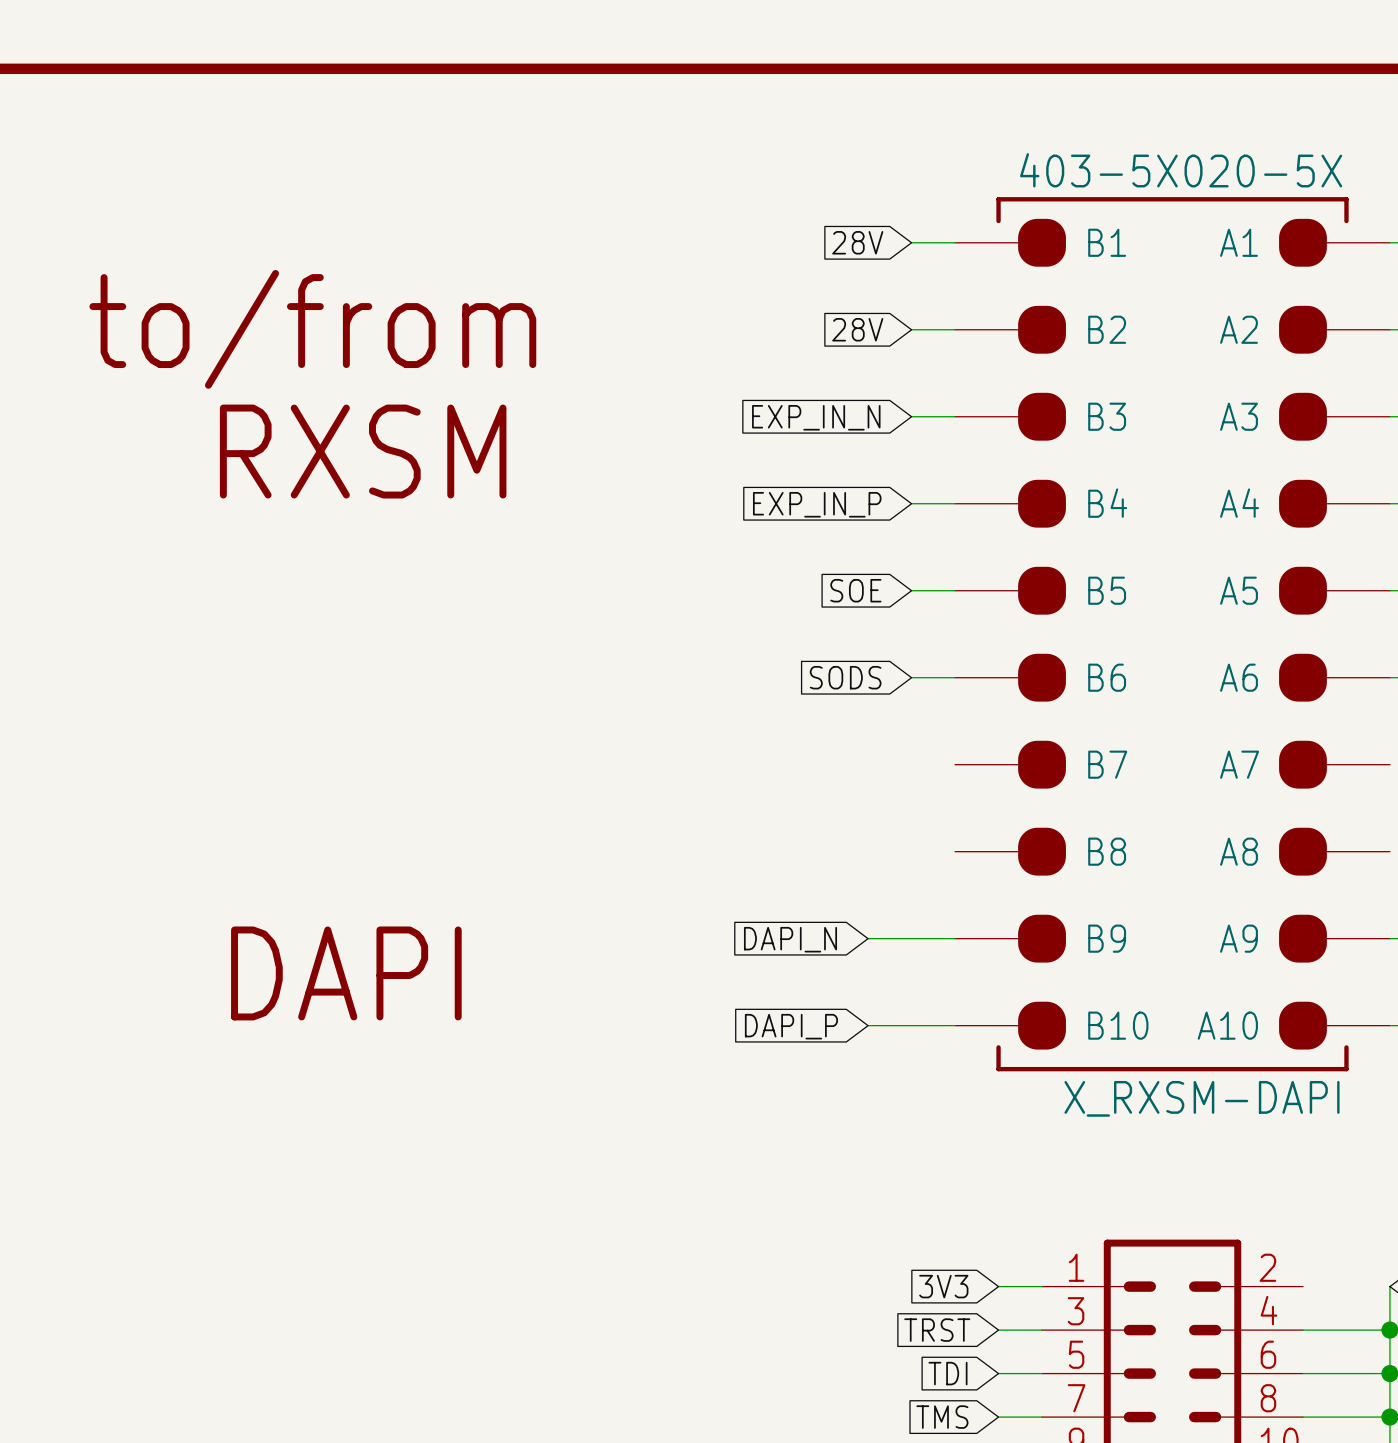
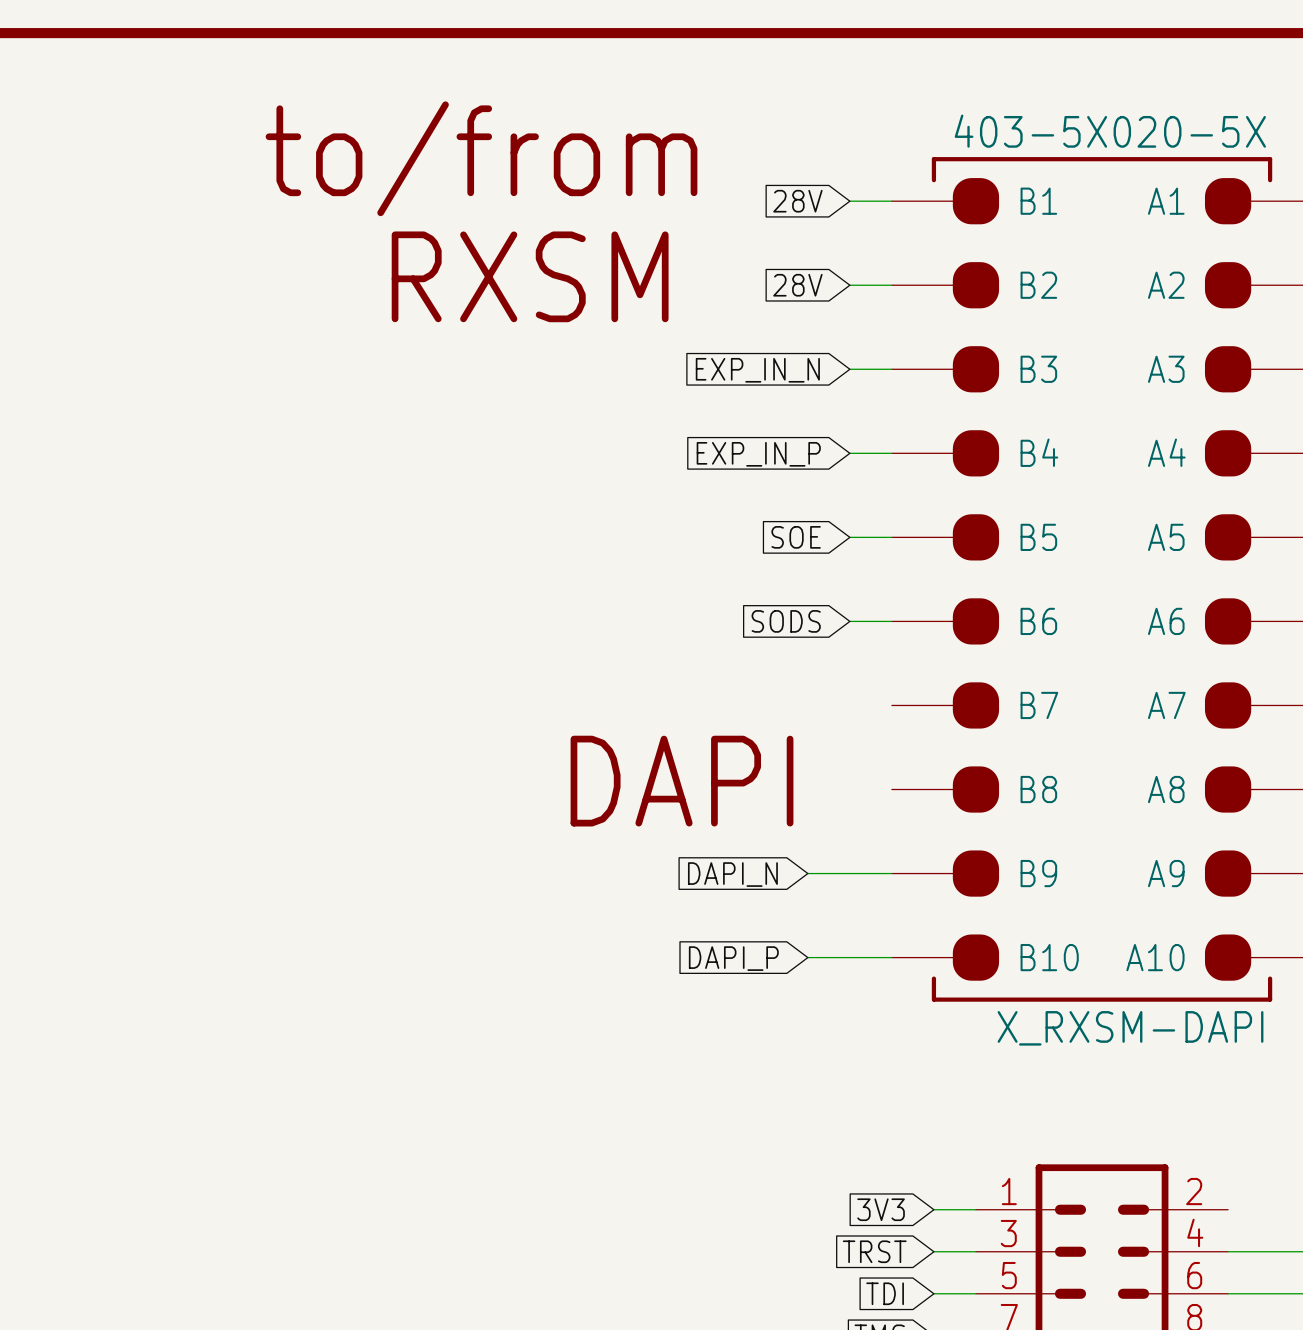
text position: to/from (312, 329) -> to/from (481, 158)
text position: RXSM (363, 451) -> RXSM (530, 276)
text position: DAPI (346, 973) -> DAPI (682, 781)

